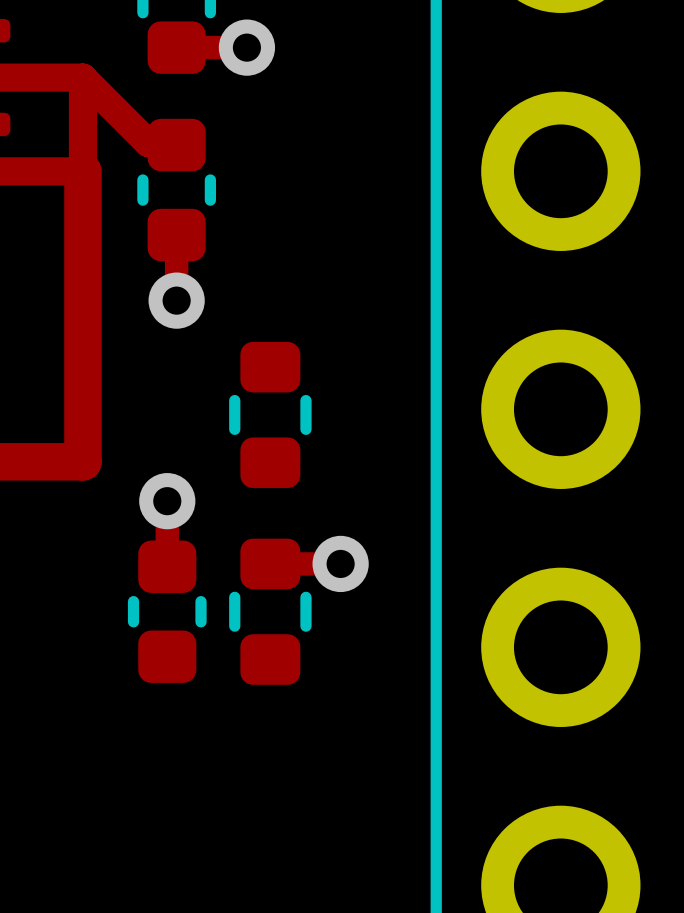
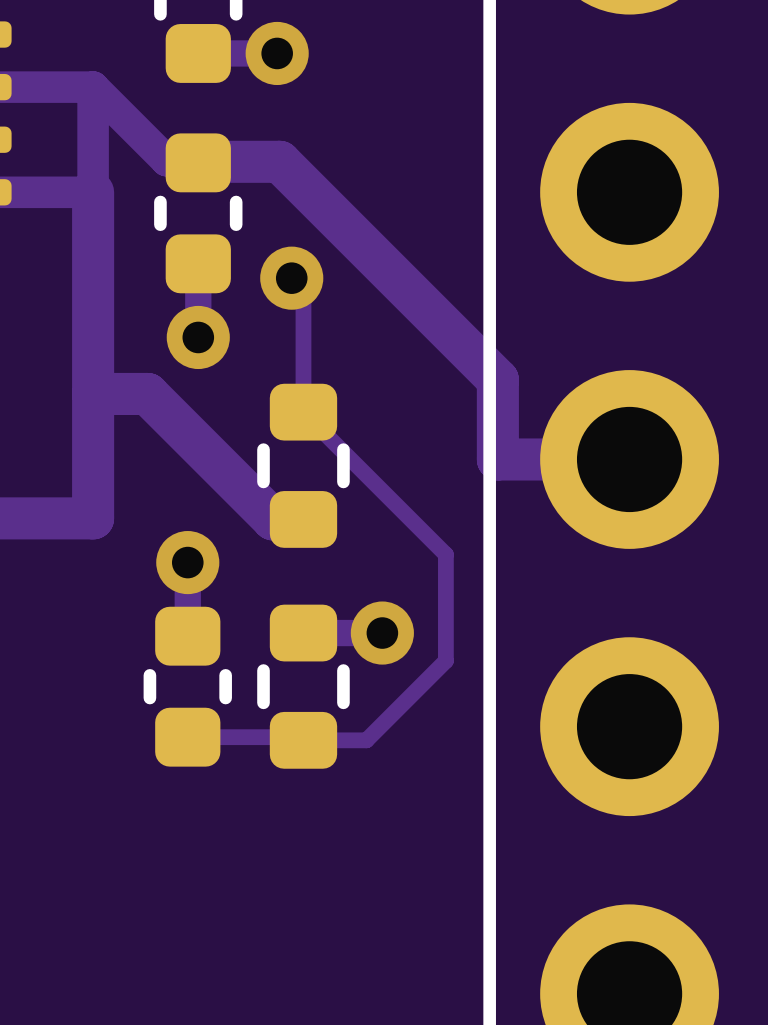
track: none -> (182, 161) (279, 161) (497, 379) (497, 459) (629, 459)
track: none -> (291, 278) (303, 289) (303, 412) (445, 554) (445, 660) (366, 740) (303, 740) (300, 737) (187, 737)
via: none -> (291, 278)
track: none -> (93, 393) (147, 393) (273, 519) (303, 519)

